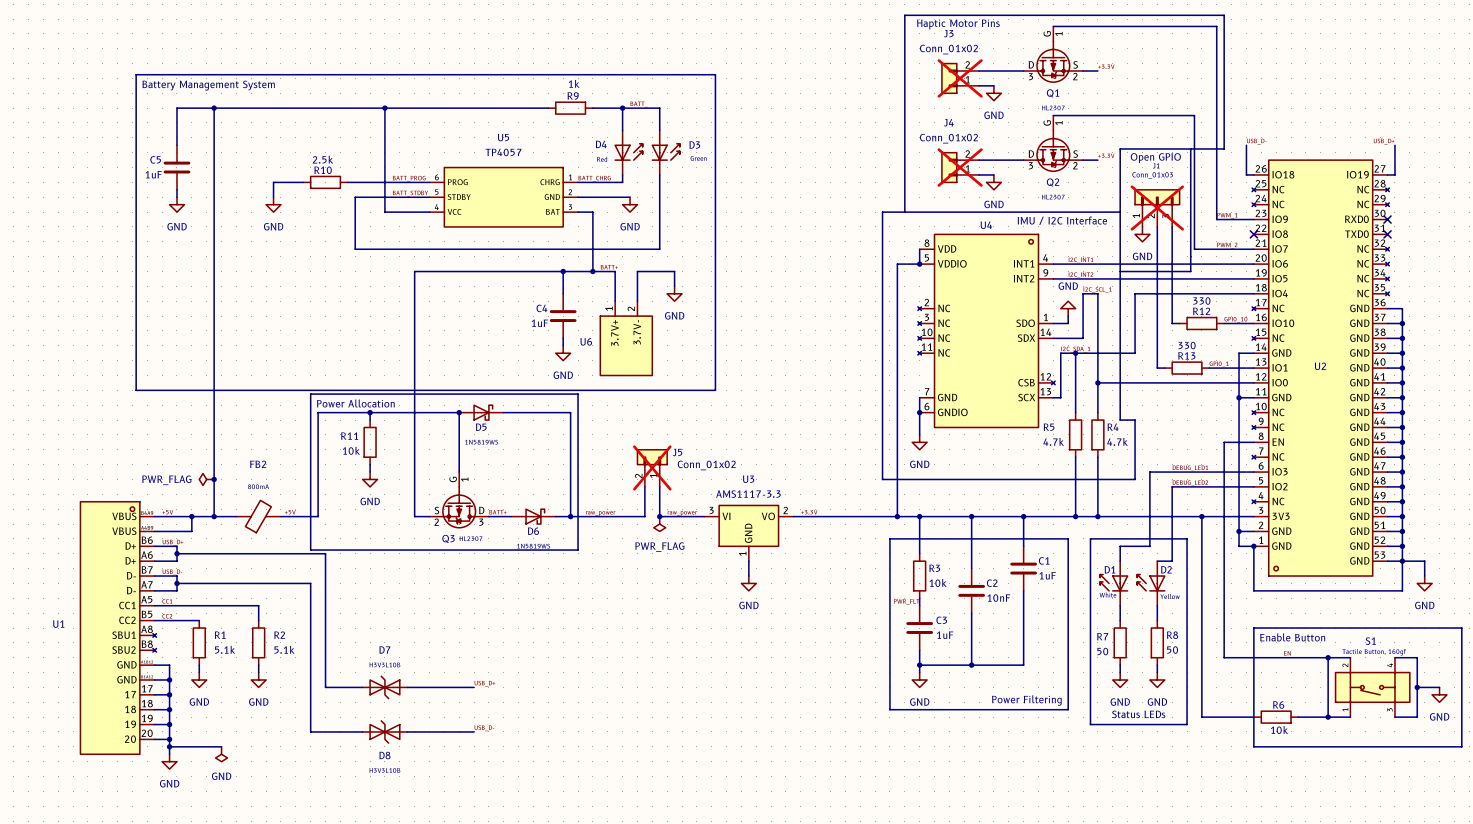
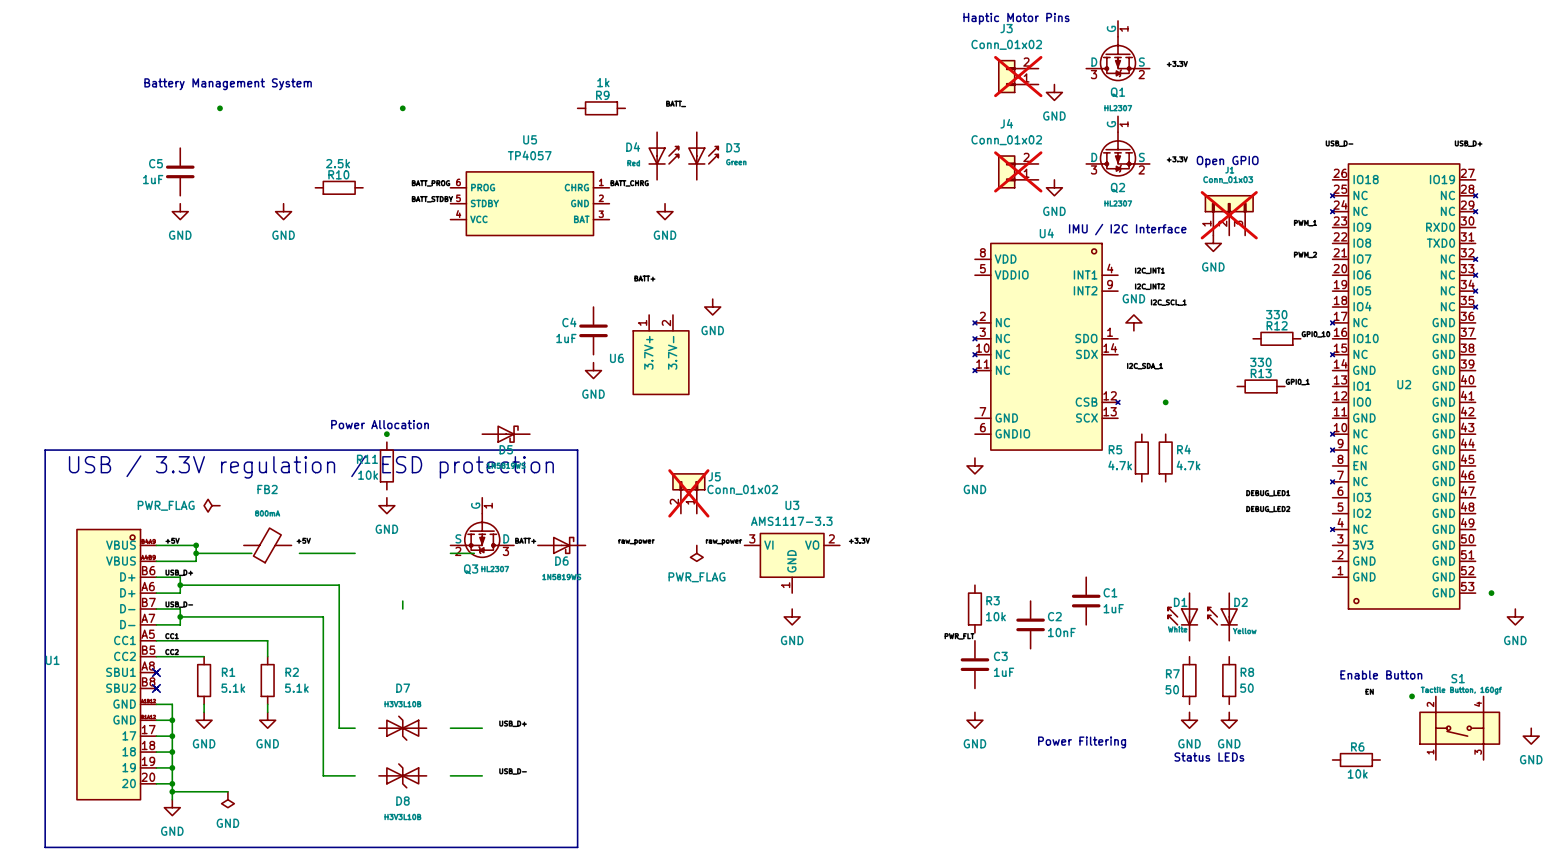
wire: (1053, 26) (1216, 26) (1216, 219) (1253, 219) -> none
wire: (979, 71) (1023, 71) -> none
wire: (1083, 71) (1097, 71) -> none
line: (136, 74) (715, 74) (715, 390) (136, 390) (136, 74) -> none
wire: (979, 85) (993, 85) -> none
wire: (214, 108) (214, 516) -> none
wire: (384, 108) (384, 212) (429, 212) -> none
wire: (548, 108) (176, 108) (176, 145) -> none
wire: (592, 108) (659, 108) (659, 130) -> none
wire: (622, 108) (622, 130) -> none
junction: (622, 108) -> none
wire: (1053, 115) (1194, 115) (1194, 249) (1253, 249) -> none
wire: (1246, 145) (1246, 174) (1253, 174) -> none
wire: (1394, 145) (1394, 174) (1387, 174) -> none
line: (1190, 148) (1190, 271) (1120, 271) -> none
wire: (979, 160) (1023, 160) -> none
wire: (1083, 160) (1097, 160) -> none
wire: (622, 174) (622, 182) (578, 182) -> none
wire: (659, 174) (659, 249) (355, 249) (355, 197) (429, 197) -> none
wire: (979, 174) (993, 174) -> none
wire: (303, 182) (273, 182) (273, 197) -> none
wire: (347, 182) (429, 182) -> none
wire: (176, 189) (176, 197) -> none
wire: (578, 197) (630, 197) -> none
wire: (578, 212) (592, 212) (592, 271) -> none
line: (904, 212) (904, 15) (1224, 15) (1224, 148) (1120, 148) (1120, 420) (1135, 420) (1135, 479) (882, 479) (882, 212) (1120, 212) -> none
no-connect mark: (1387, 219) -> none
wire: (1157, 226) (1157, 368) (1164, 368) -> none
wire: (1172, 226) (1172, 323) (1179, 323) -> none
no-connect mark: (1253, 234) -> none
no-connect mark: (1387, 234) -> none
wire: (919, 249) (919, 264) (897, 264) (897, 516) -> none
junction: (919, 264) -> none
wire: (1053, 264) (1253, 264) -> none
wire: (563, 271) (563, 293) -> none
junction: (563, 271) -> none
junction: (592, 271) -> none
wire: (1053, 278) (1253, 278) -> none
wire: (674, 286) (674, 271) (637, 271) (637, 301) -> none
wire: (1253, 293) (1135, 293) (1135, 353) (1060, 353) (1060, 397) (1053, 397) -> none
wire: (615, 301) (615, 271) (414, 271) (414, 516) (429, 516) -> none
wire: (1387, 308) (1402, 308) (1402, 590) (1253, 590) (1253, 546) (1239, 546) (1239, 353) (1253, 353) -> none
wire: (1068, 316) (1068, 323) (1053, 323) -> none
wire: (1224, 323) (1253, 323) -> none
wire: (1387, 323) (1402, 323) -> none
junction: (1402, 323) -> none
wire: (563, 338) (563, 345) -> none
wire: (1053, 338) (1083, 338) (1083, 293) (1097, 293) (1097, 412) -> none
wire: (1387, 338) (1402, 338) -> none
junction: (1402, 338) -> none
wire: (1075, 353) (1075, 412) -> none
junction: (1075, 353) -> none
wire: (1387, 353) (1402, 353) -> none
junction: (1402, 353) -> none
wire: (1209, 368) (1253, 368) -> none
wire: (1387, 368) (1402, 368) -> none
junction: (1402, 368) -> none
wire: (1097, 382) (1253, 382) -> none
wire: (1387, 382) (1402, 382) -> none
junction: (1402, 382) -> none
line: (310, 394) (578, 394) (578, 550) (310, 550) (310, 394) -> none
wire: (919, 397) (919, 434) -> none
wire: (1239, 397) (1253, 397) -> none
junction: (1239, 397) -> none
wire: (1387, 397) (1402, 397) -> none
junction: (1402, 397) -> none
wire: (370, 412) (370, 420) -> none
junction: (459, 412) -> none
wire: (503, 412) (570, 412) (570, 516) -> none
junction: (919, 412) -> none
wire: (1387, 412) (1402, 412) -> none
junction: (1402, 412) -> none
line: none -> (45, 450) (577, 450) (577, 847) (45, 847) (45, 450)
wire: (1387, 427) (1402, 427) -> none
junction: (1402, 427) -> none
wire: (1253, 442) (1224, 442) (1224, 657) (1350, 657) -> none
wire: (1387, 442) (1402, 442) -> none
junction: (1402, 442) -> none
text: none -> USB / 3.3V regulation / ESD protection (311, 466)
wire: (1075, 457) (1075, 516) -> none
wire: (1097, 457) (1097, 516) -> none
wire: (1387, 457) (1402, 457) -> none
junction: (1402, 457) -> none
wire: (370, 464) (370, 472) -> (402, 601) (402, 609)
wire: (459, 472) (459, 412) (318, 412) (318, 516) (280, 516) -> none
wire: (1253, 472) (1149, 472) (1149, 546) (1120, 546) (1120, 561) -> none
wire: (1387, 472) (1402, 472) -> none
junction: (1402, 472) -> none
junction: (214, 479) -> none
wire: (644, 486) (644, 516) (555, 516) -> none
wire: (659, 486) (659, 516) (704, 516) -> none
wire: (1253, 486) (1172, 486) (1172, 561) (1157, 561) -> none
wire: (1387, 486) (1402, 486) -> none
junction: (1402, 486) -> none
wire: (1387, 501) (1402, 501) -> none
junction: (1402, 501) -> none
wire: (191, 516) (236, 516) -> none
junction position: (214, 516) -> (196, 553)
wire: (488, 516) (511, 516) -> (450, 553) (474, 553)
junction: (570, 516) -> none
junction: (659, 516) -> none
wire: (793, 516) (1253, 516) -> none
junction: (897, 516) -> none
wire: (919, 516) (919, 553) -> none
junction: (919, 516) -> none
wire: (971, 516) (971, 568) -> none
junction: (971, 516) -> none
wire: (1023, 516) (1023, 546) -> none
junction: (1023, 516) -> none
junction: (1075, 516) -> none
junction: (1097, 516) -> none
wire: (1201, 516) (1201, 717) (1253, 717) -> none
junction: (1201, 516) -> none
wire: (1387, 516) (1402, 516) -> none
junction: (1402, 516) -> none
wire: none -> (196, 553) (251, 553)
wire: none -> (299, 553) (355, 553)
wire: (1239, 531) (1253, 531) -> none
junction: (1239, 531) -> none
wire: (1387, 531) (1402, 531) -> none
junction: (1402, 531) -> none
line: (889, 538) (1068, 538) (1068, 709) (889, 709) (889, 538) -> none
line: (1090, 538) (1187, 538) (1187, 724) (1090, 724) (1090, 538) -> none
junction: (1253, 546) -> none
wire: (1387, 546) (1402, 546) -> none
junction: (1402, 546) -> none
wire: (748, 561) (748, 576) -> none
wire: (1387, 561) (1424, 561) (1424, 576) -> none
wire: (1023, 590) (1023, 665) (919, 665) -> none
wire: (919, 598) (919, 605) -> none
wire: (1120, 605) (1120, 620) -> none
wire: (1157, 605) (1157, 620) -> none
wire: (971, 613) (971, 665) -> none
line: (1253, 628) (1461, 628) (1461, 746) (1253, 746) (1253, 628) -> none
no-connect mark: none -> (156, 672)
no-connect mark: none -> (156, 688)
wire: (919, 650) (919, 672) -> none
wire: (1328, 657) (1328, 717) -> none
wire: (1394, 657) (1417, 657) (1417, 717) (1394, 717) -> none
junction: (919, 665) -> none
junction: (971, 665) -> none
wire: (1120, 665) (1120, 672) -> none
wire: (1157, 665) (1157, 672) -> none
wire: (340, 687) (362, 687) -> none
wire: (407, 687) (429, 687) -> none
wire: (459, 687) (474, 687) -> none
wire: (1417, 687) (1439, 687) -> none
junction: (1417, 687) -> none
wire: (1298, 717) (1350, 717) -> none
junction: (1328, 717) -> none
wire: (340, 731) (362, 731) -> none
wire: (407, 731) (429, 731) -> none
wire: (459, 731) (474, 731) -> none

